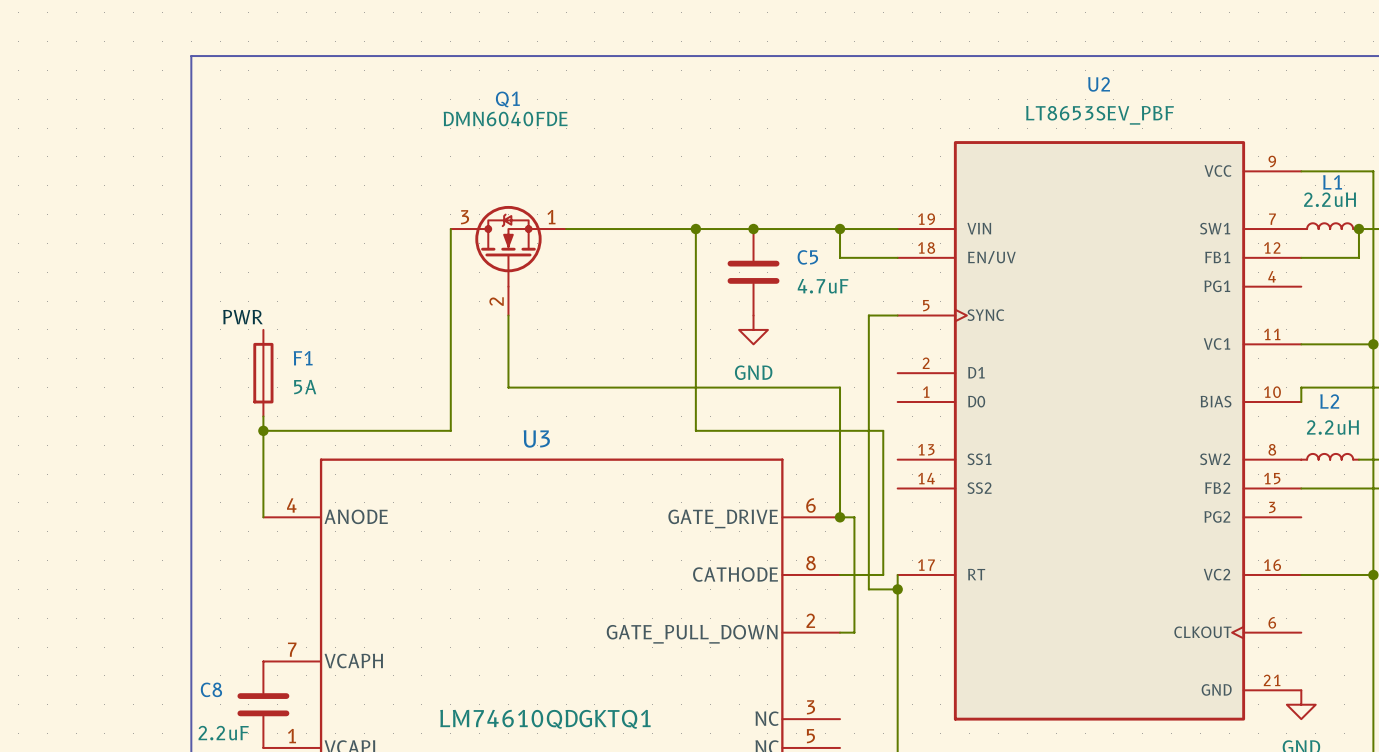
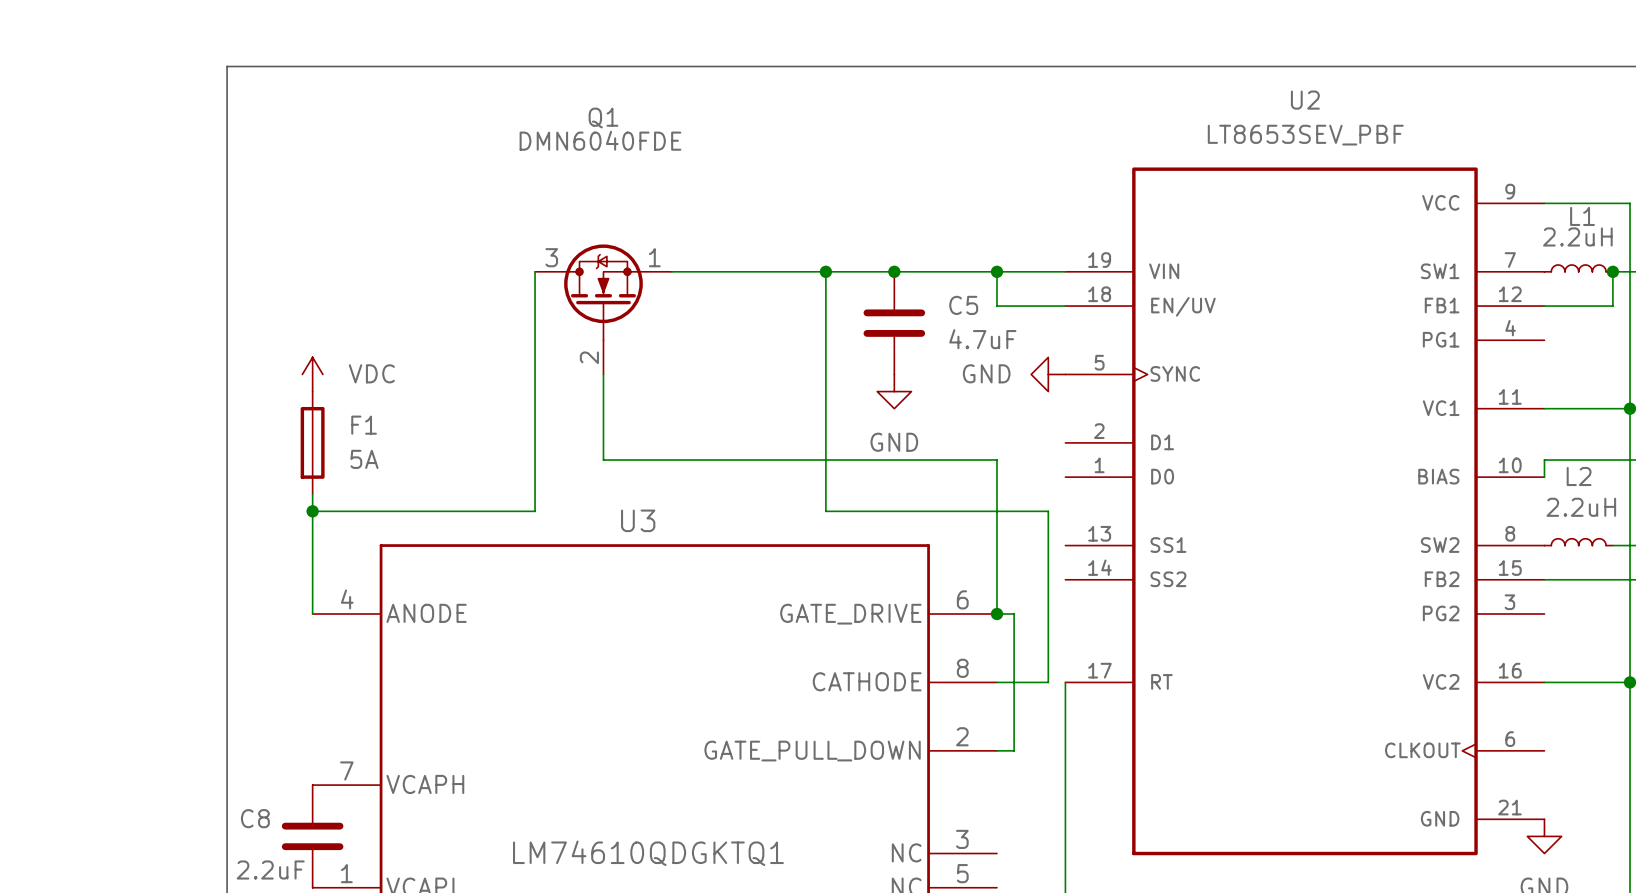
power symbol: none -> VDC (312, 374)
power symbol: none -> GND (1048, 374)
wire: (897, 315) (868, 315) (868, 589) (897, 589) -> none
label: PWR (242, 317) -> none
junction: (897, 589) -> none

